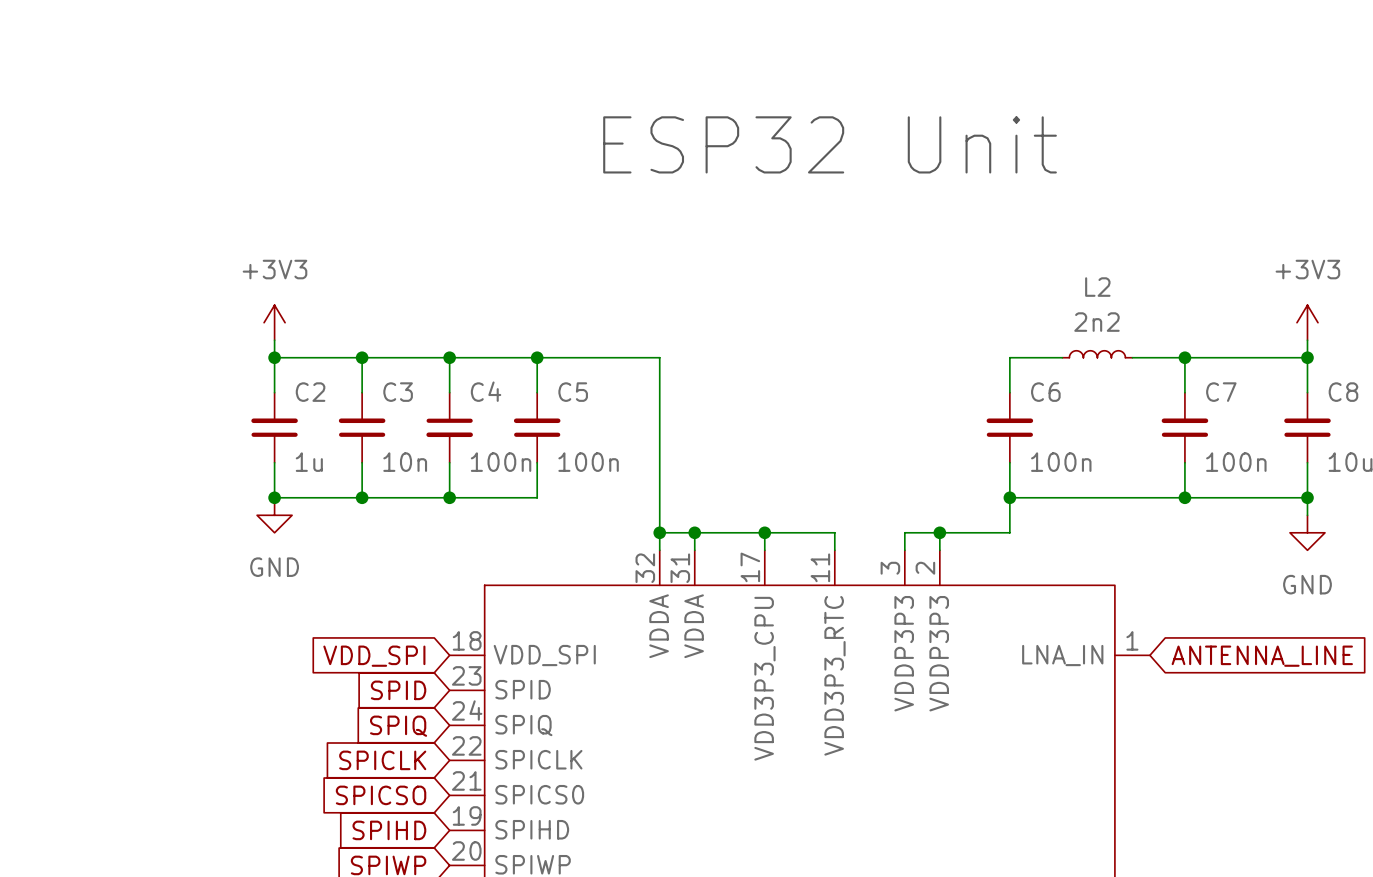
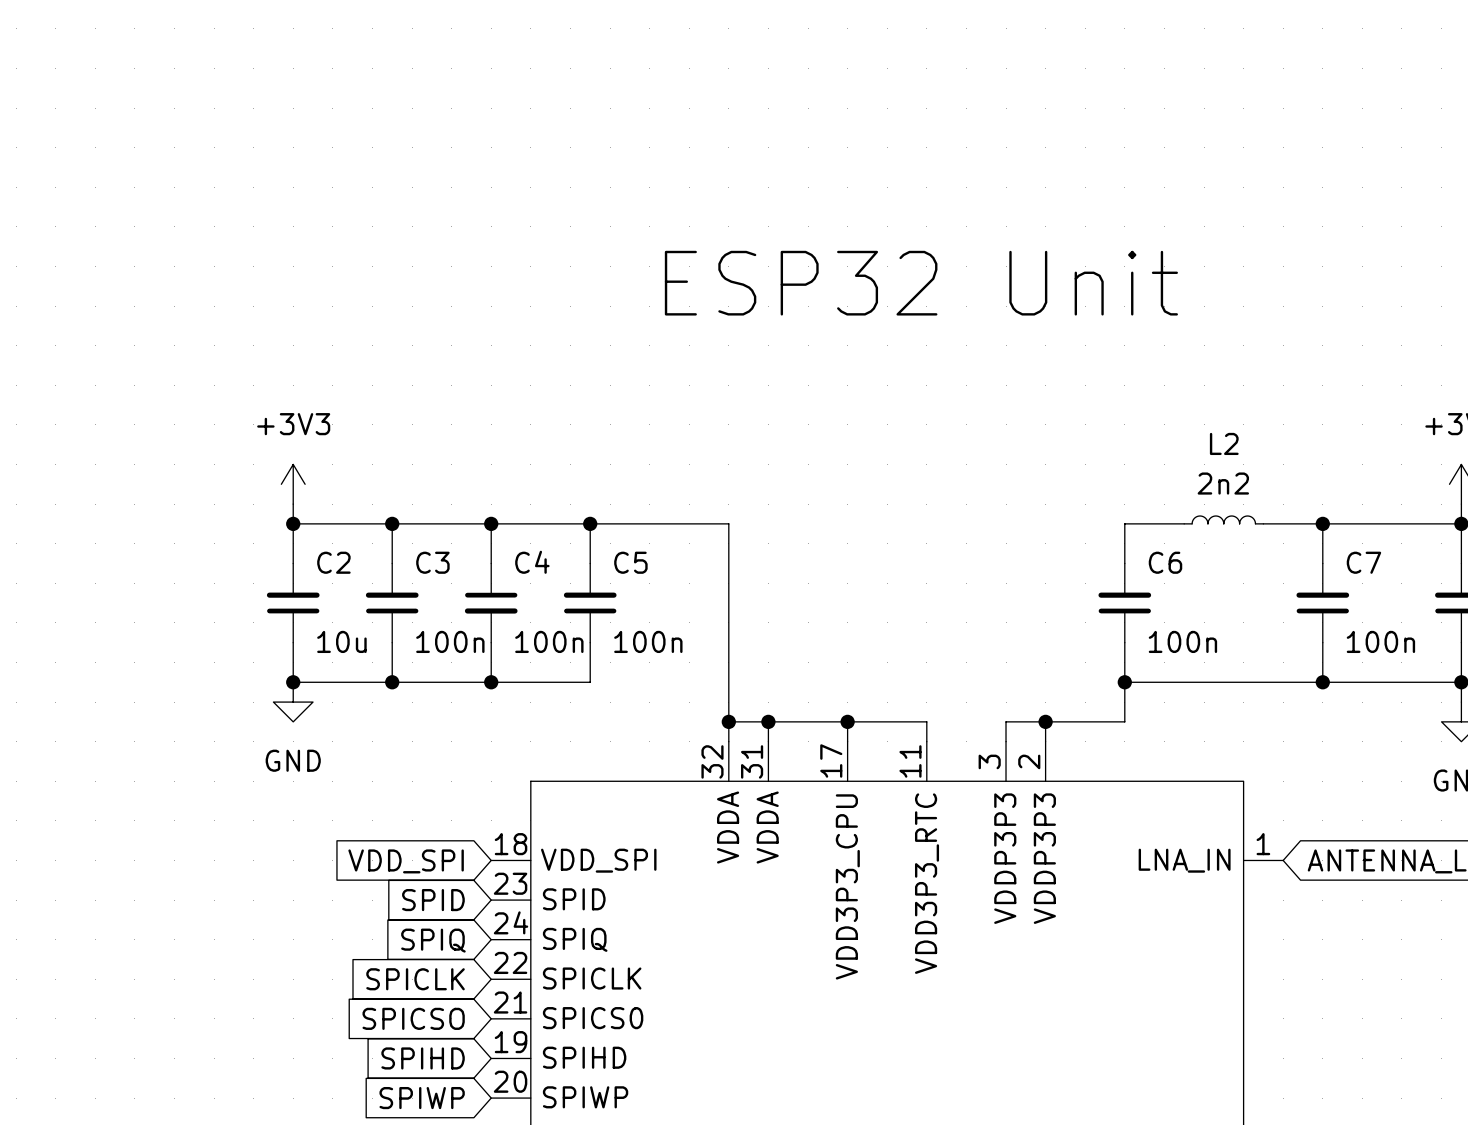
C2 value: 1u (309, 462) -> 10u (341, 641)
C3 value: 10n (405, 462) -> 100n (450, 641)

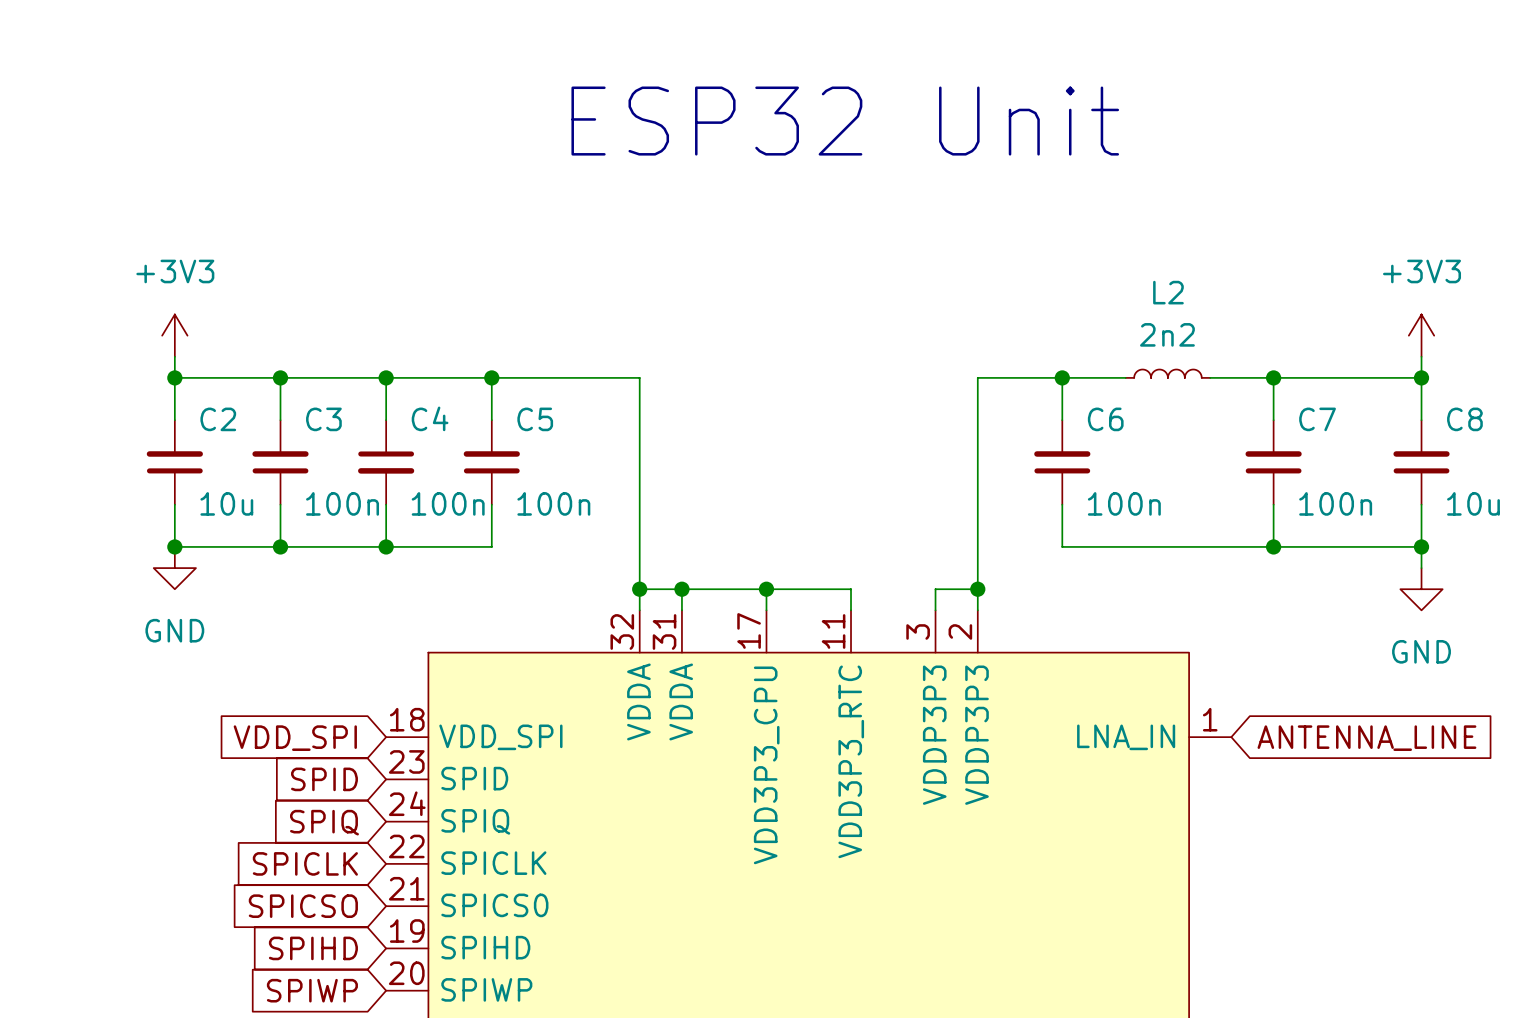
junction: none -> (1062, 377)
wire: (1124, 682) (1124, 721) (1045, 721) -> (1062, 377) (977, 377) (977, 589)
junction: (1124, 682) -> none

